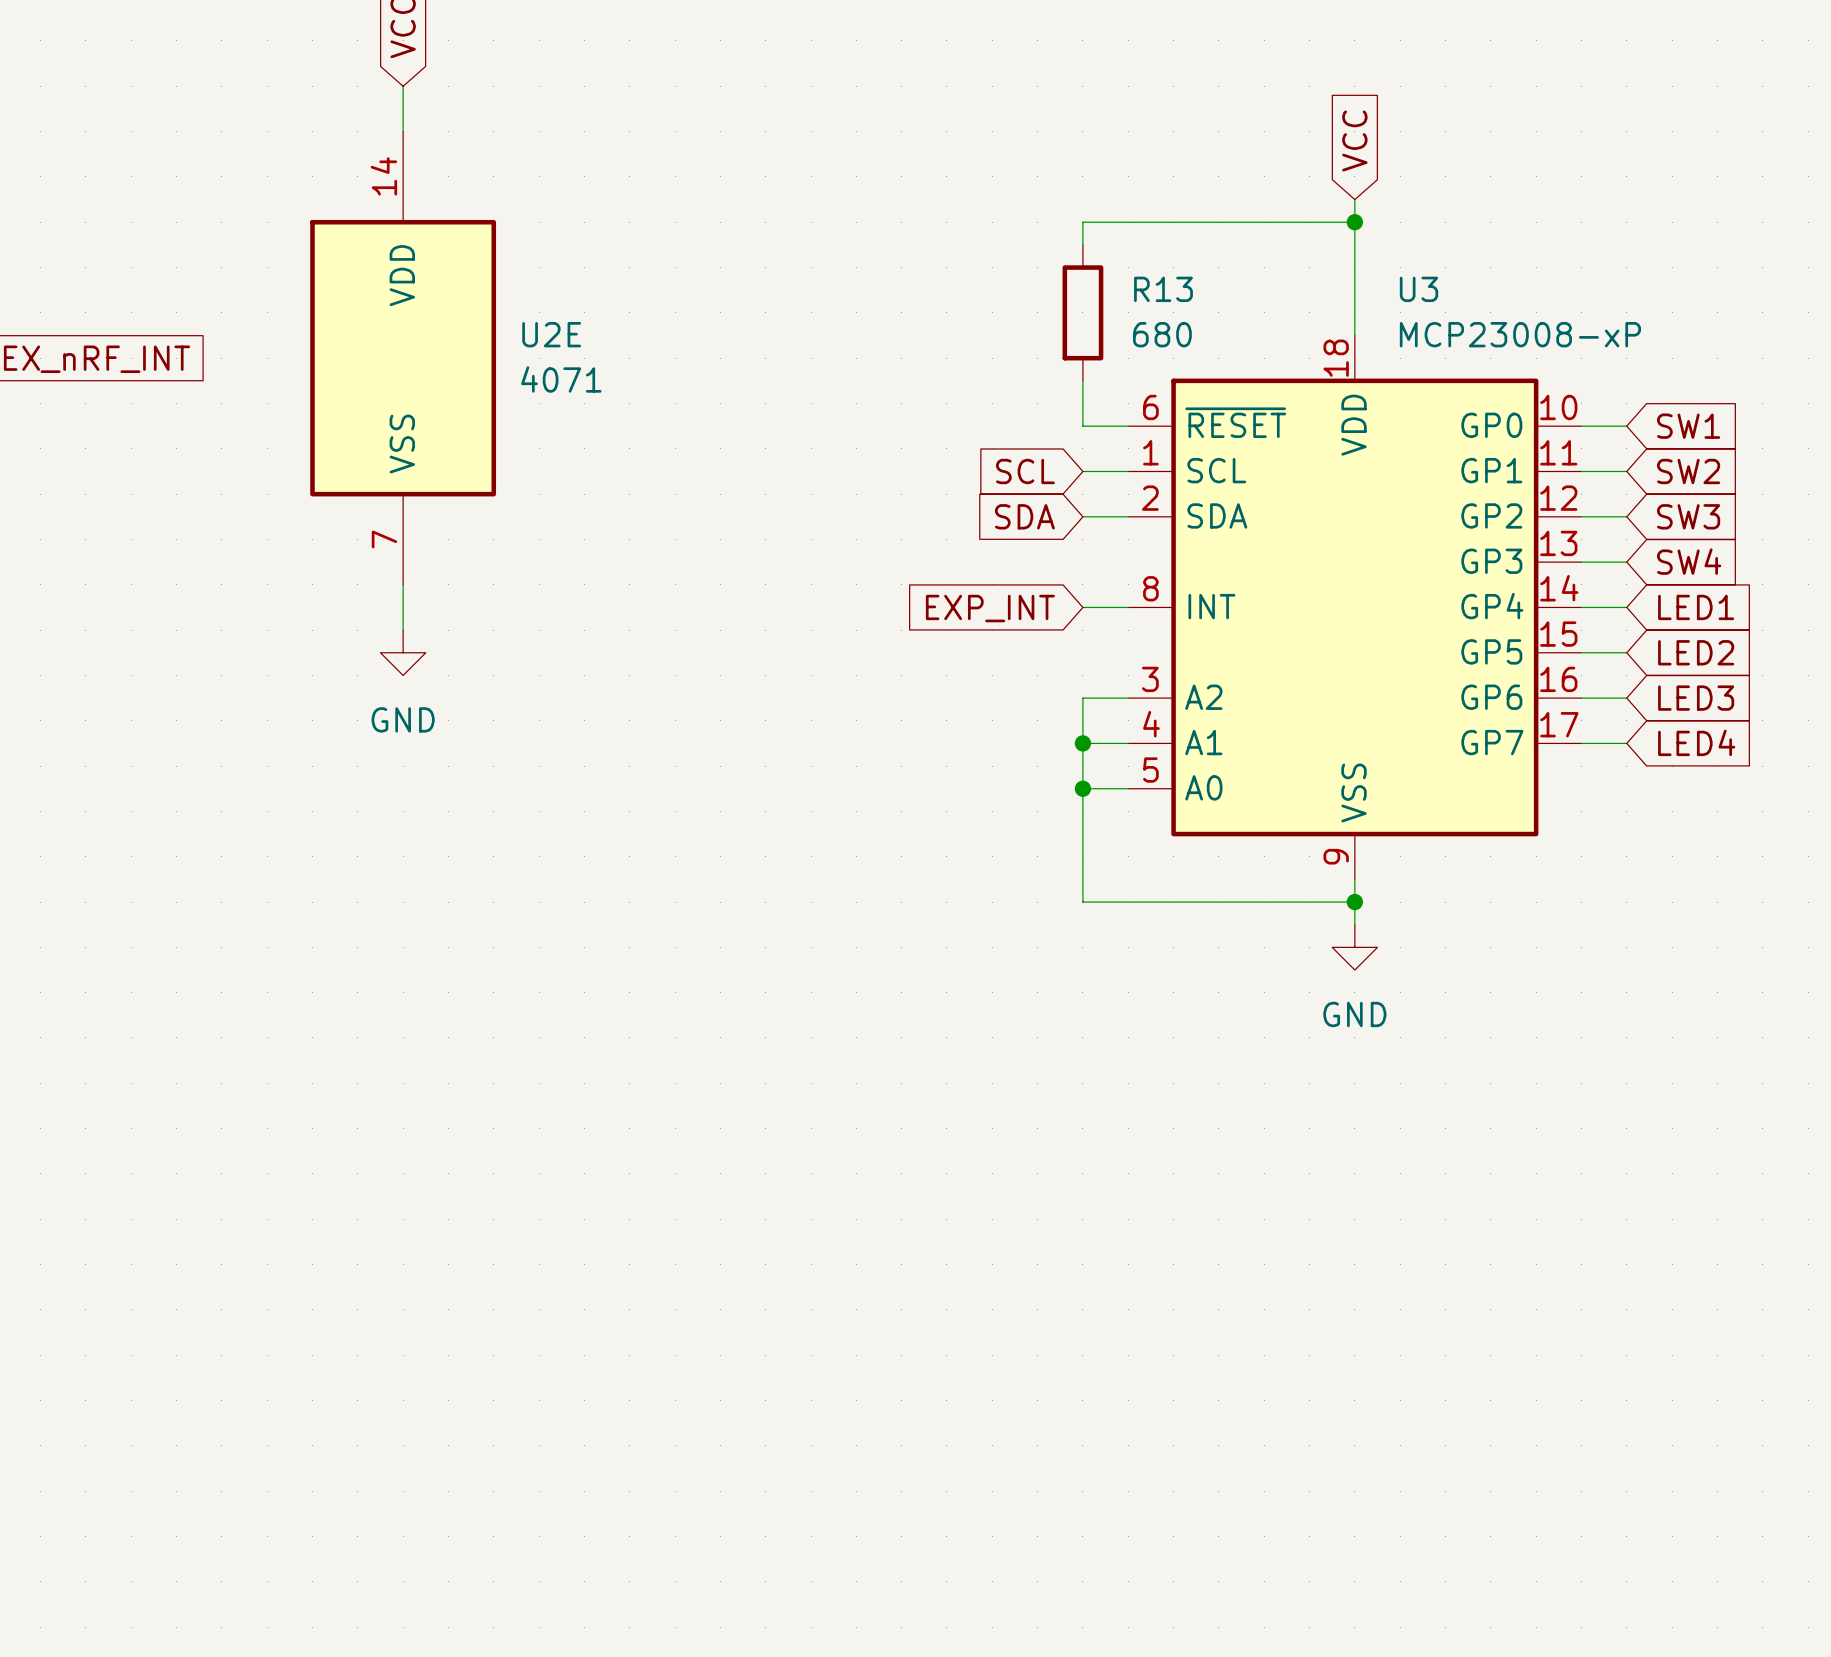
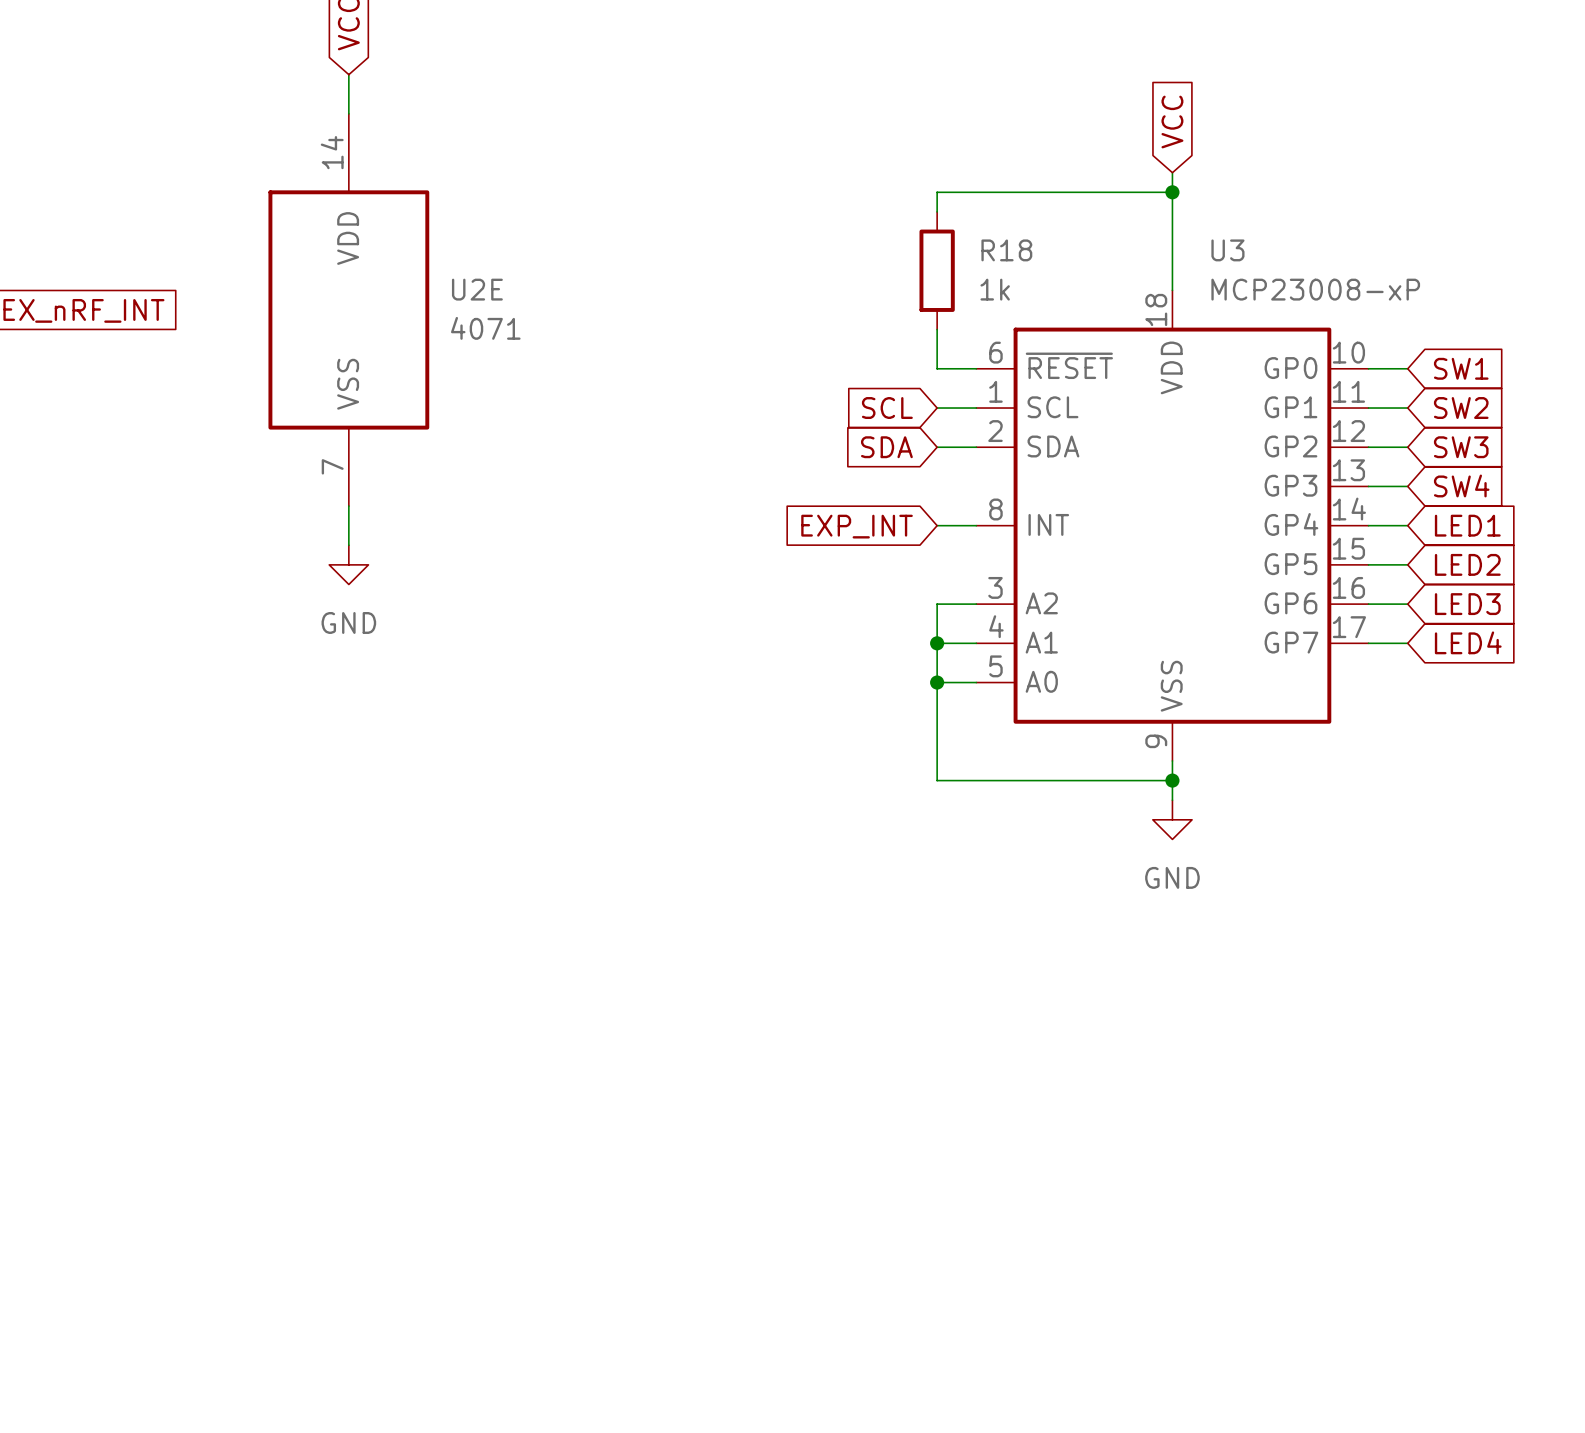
R13 name: R13 (1163, 289) -> R18 (1006, 250)
R13 value: 680 (1162, 334) -> 1k (995, 289)

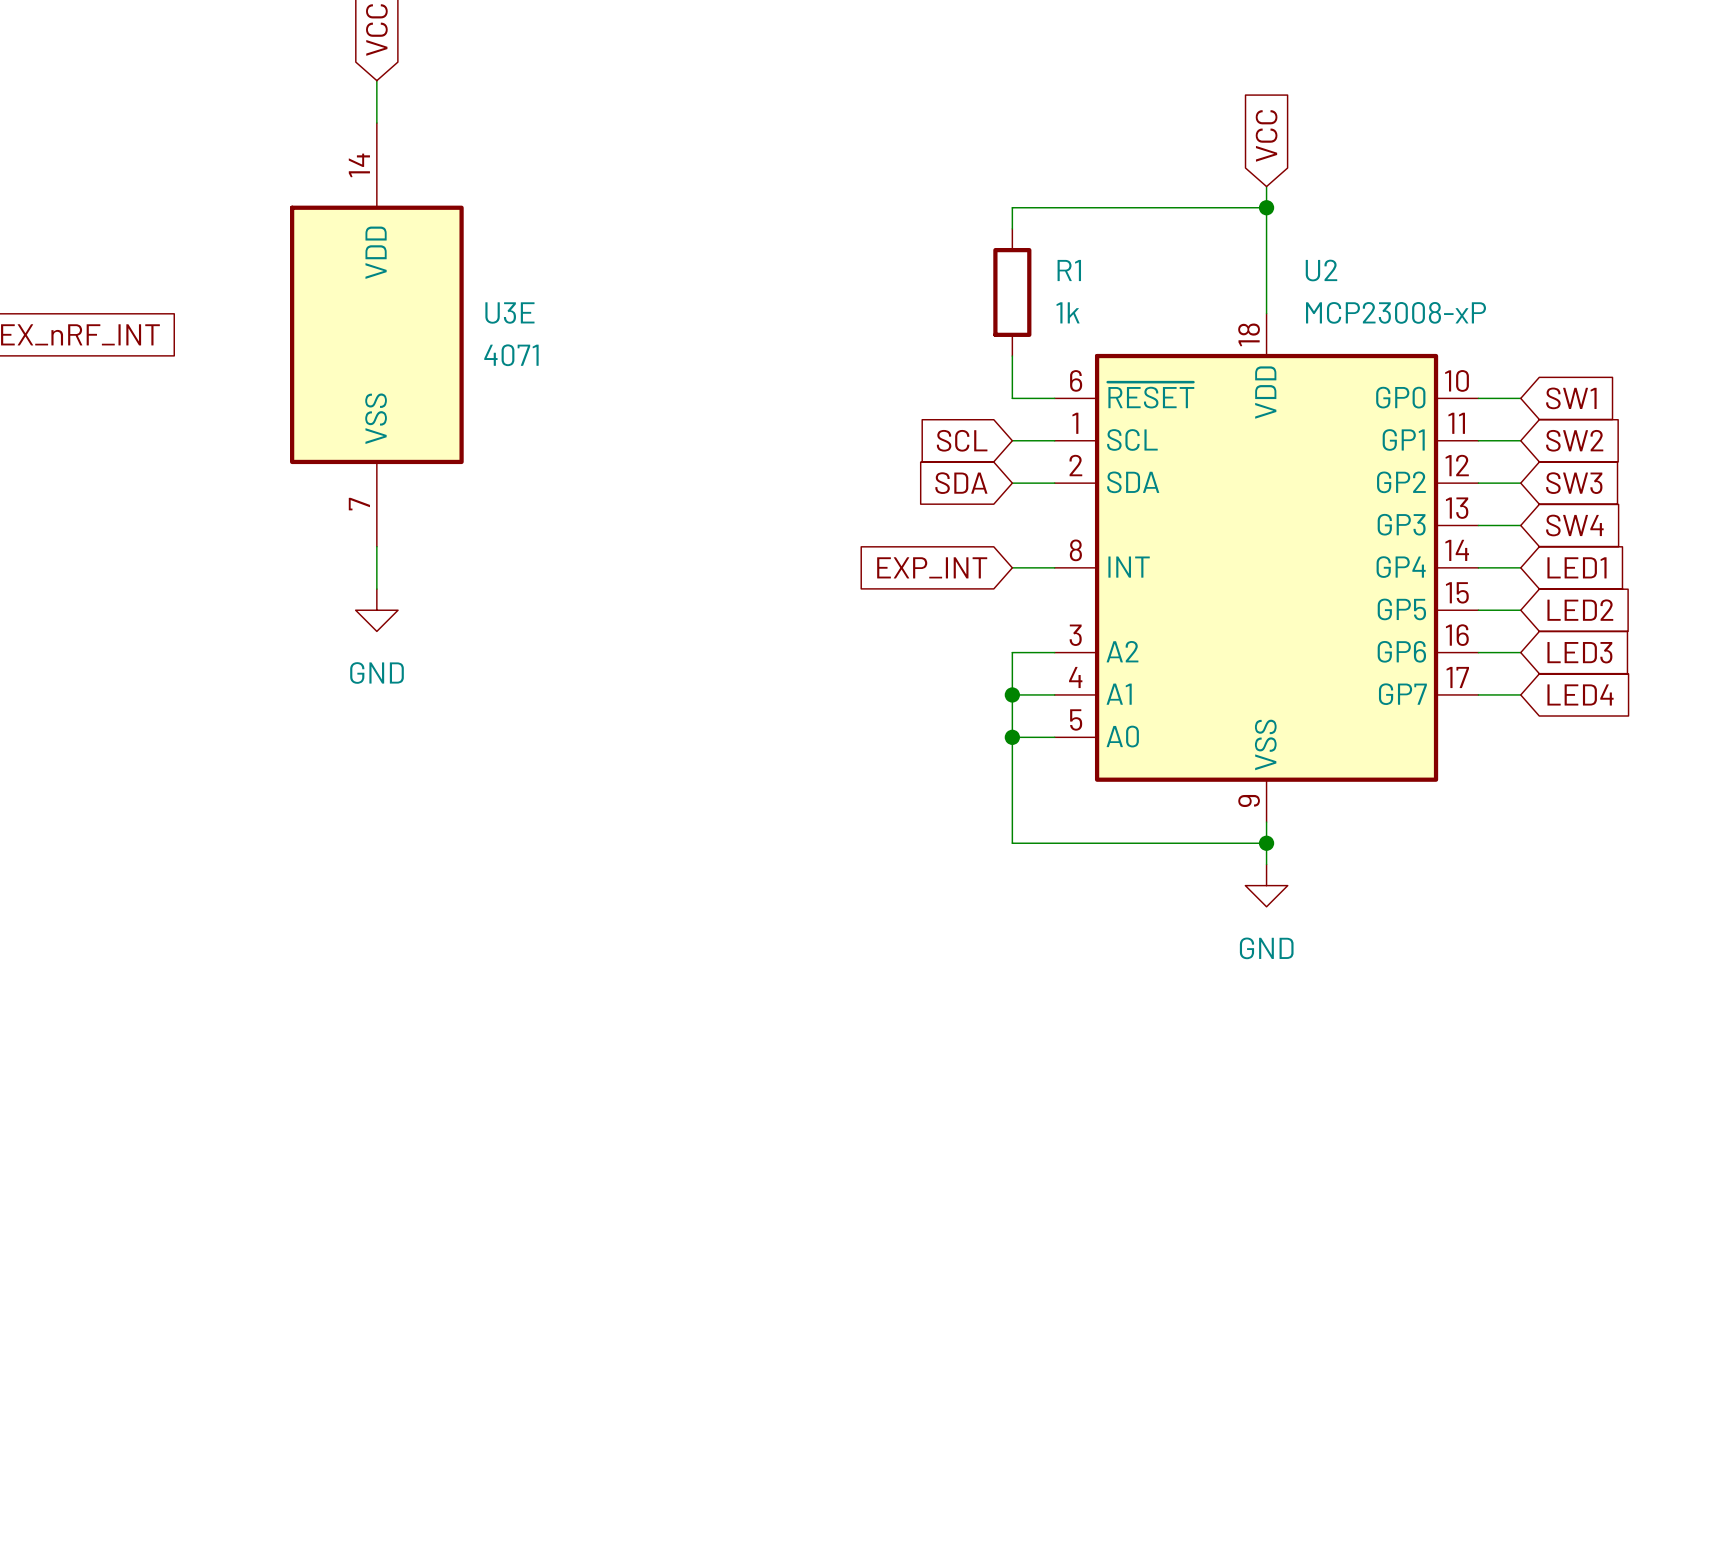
R18 name: R18 (1006, 250) -> R1 (1069, 270)
U3 name: U3 (1227, 250) -> U2 (1321, 270)
U2E name: U2E (477, 289) -> U3E (509, 312)

